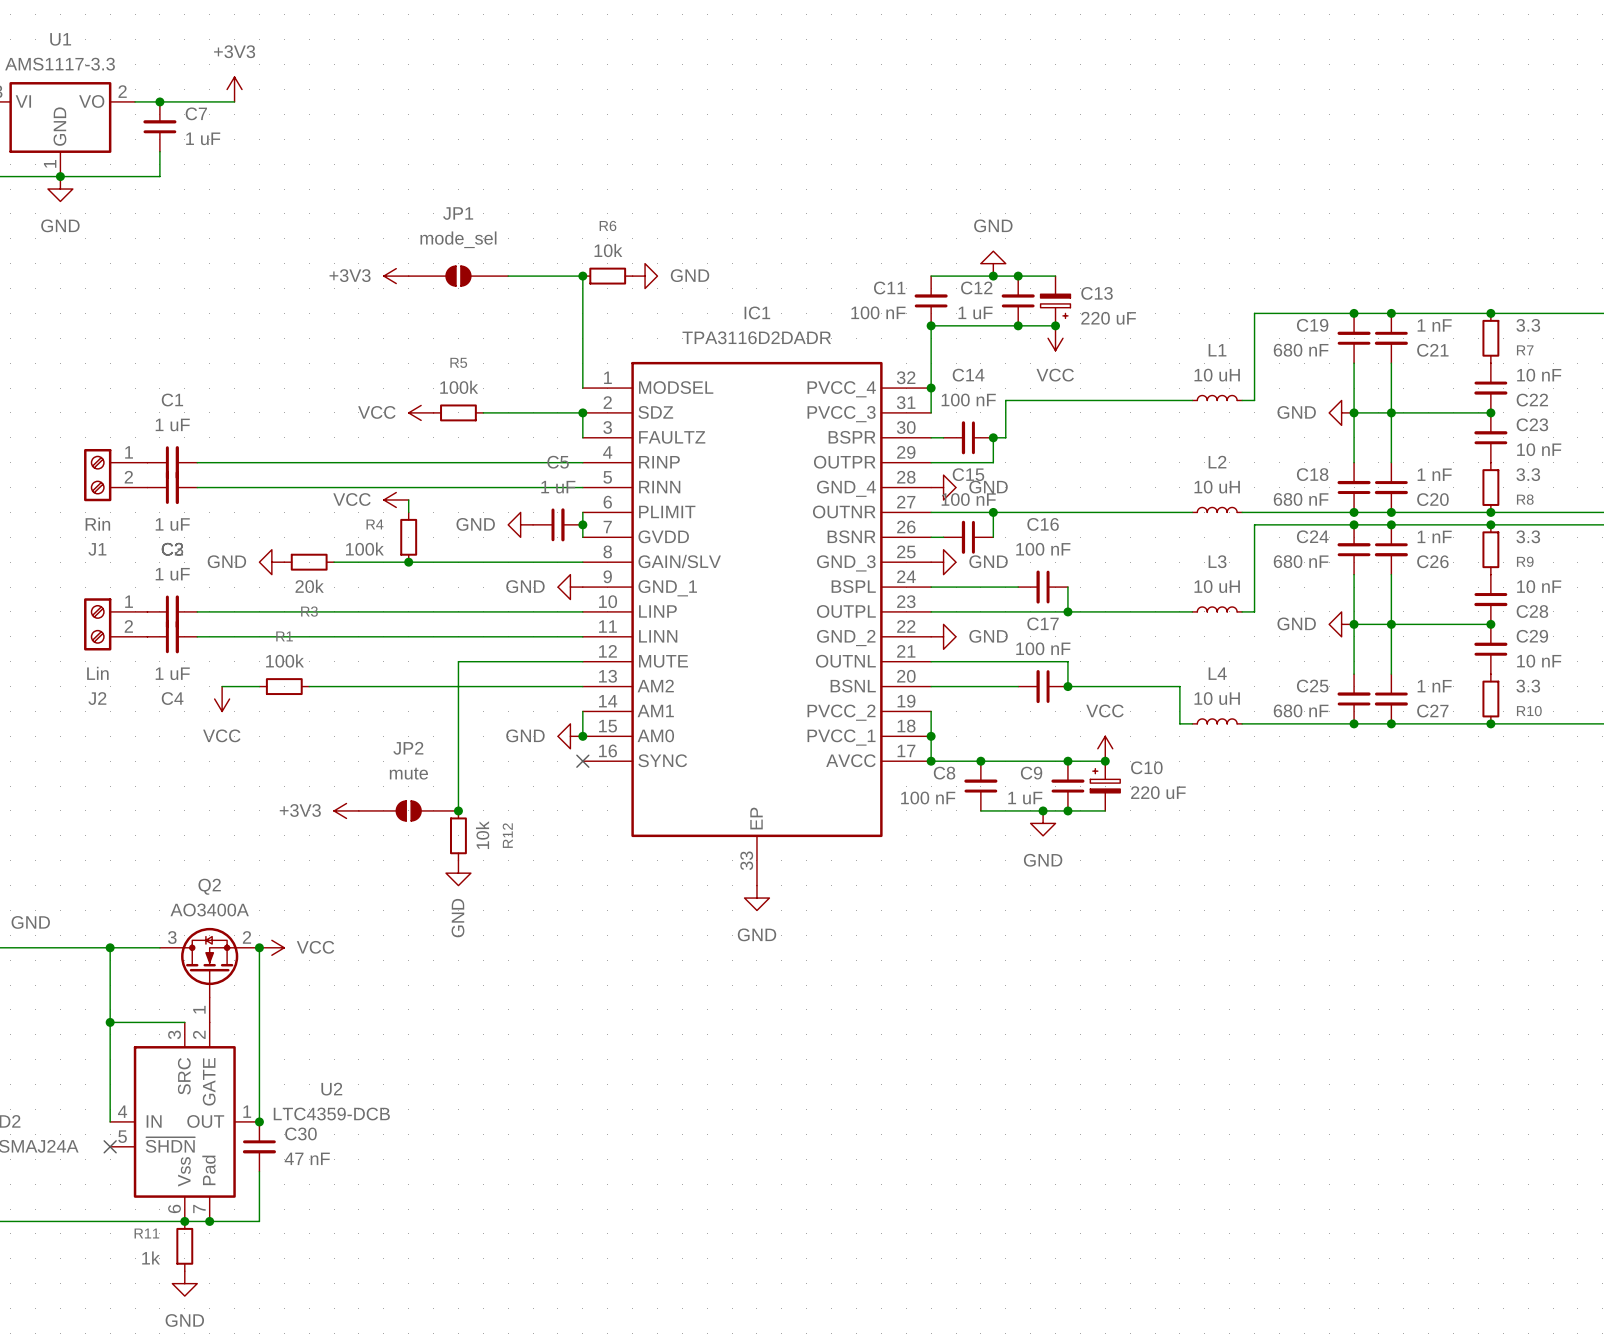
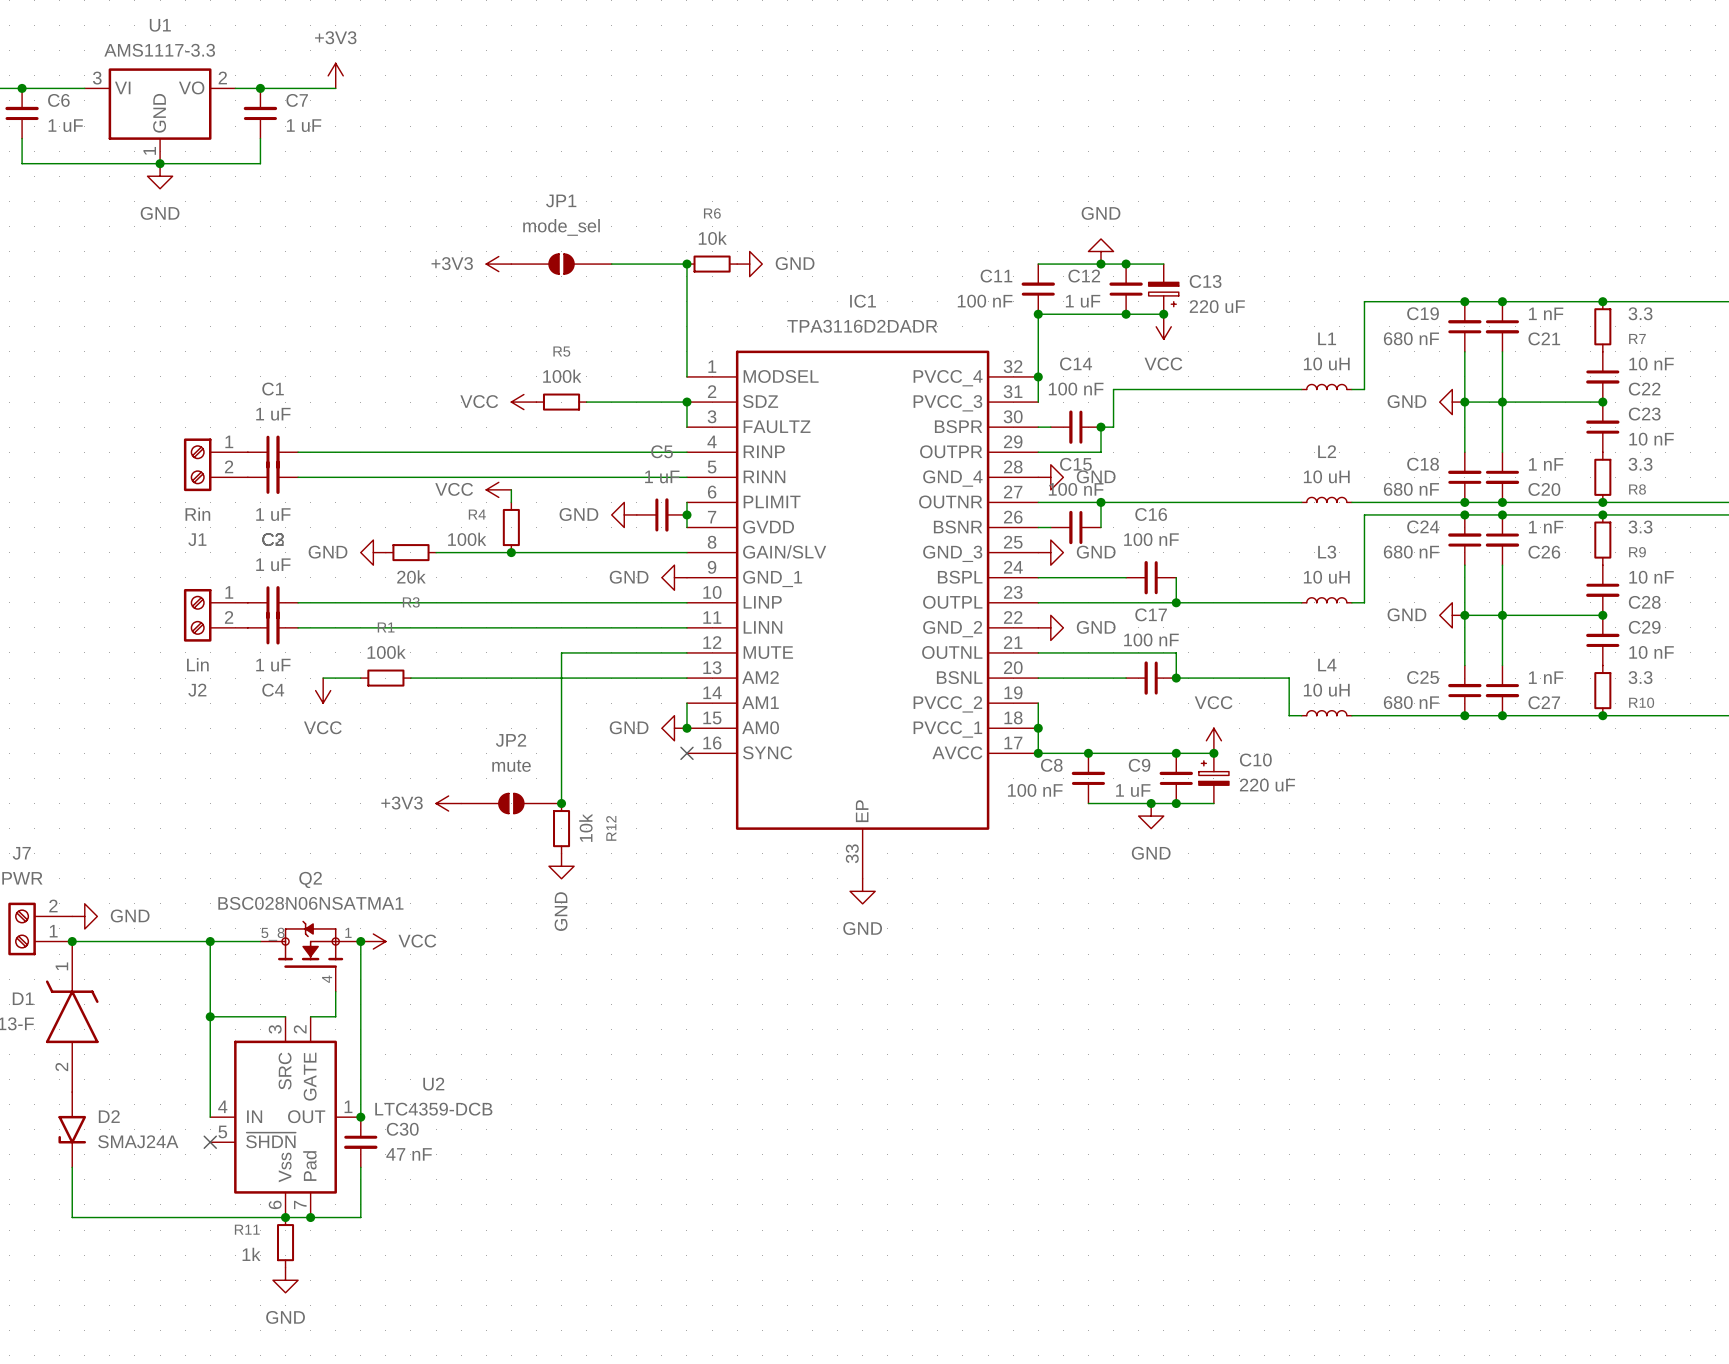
Q2 value: AO3400A (209, 910) -> BSC028N06NSATMA1 (310, 903)
Q2 symbol: [159, 927, 260, 1023] -> [260, 920, 361, 992]
wire: none -> (335, 991) (335, 1016) (310, 1016)

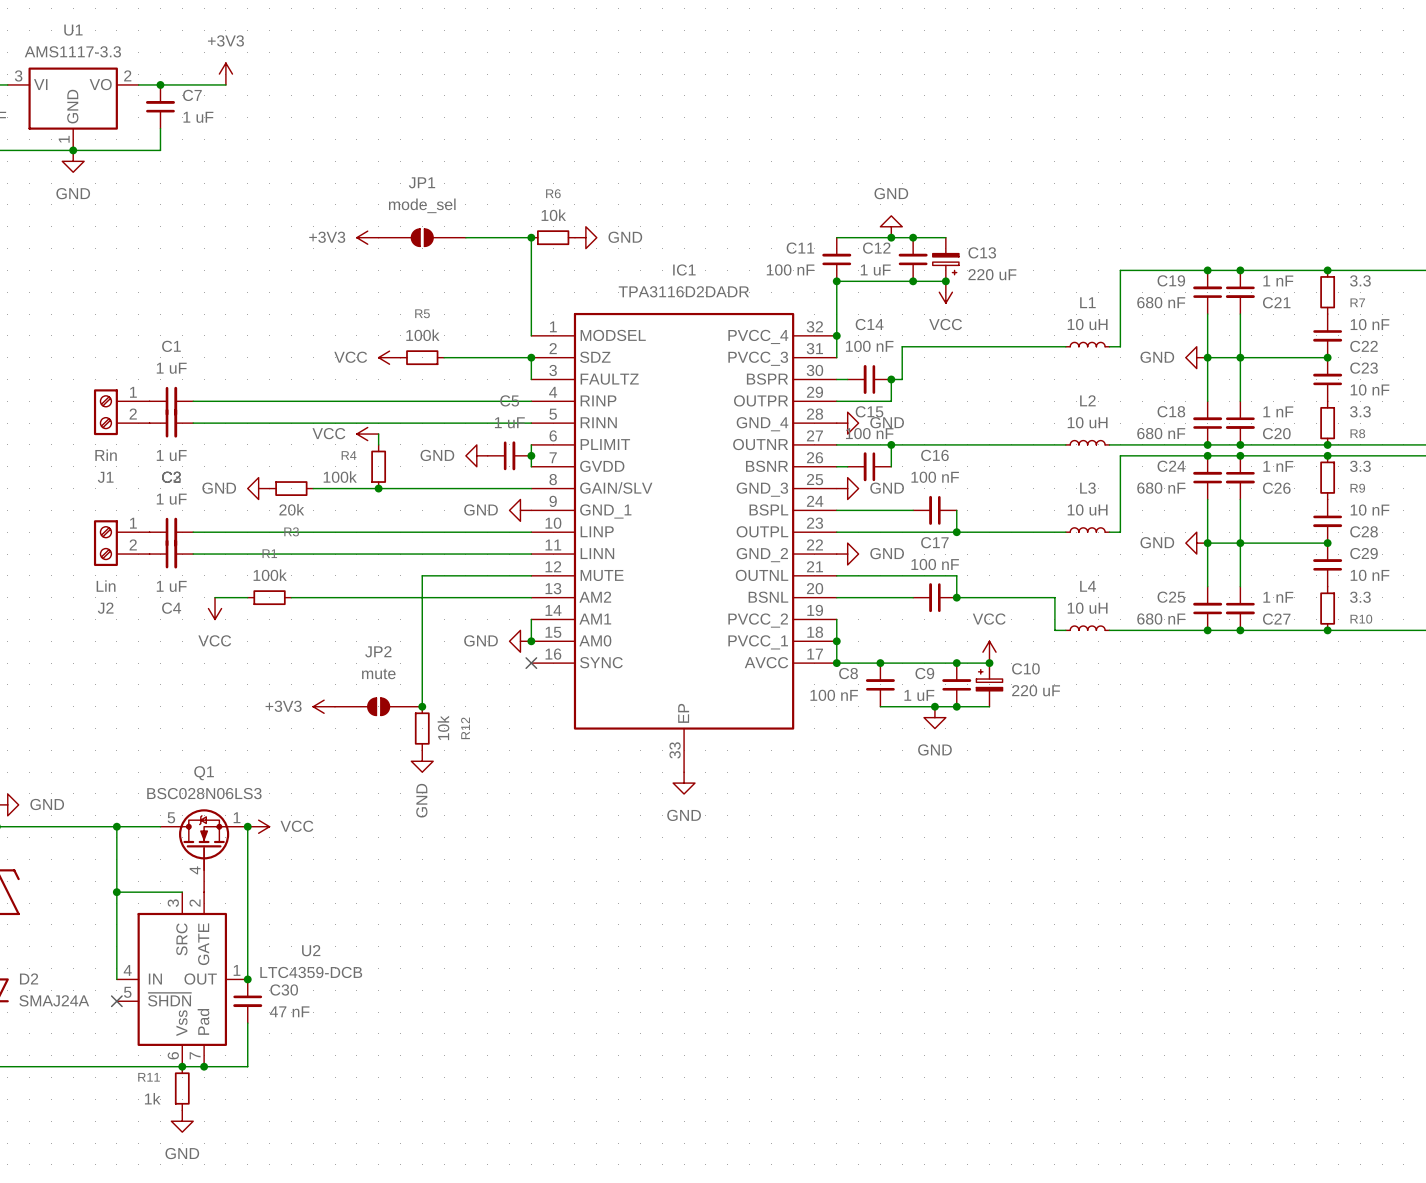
Q2: BSC028N06NSATMA1 (310, 956) -> none
Q1: none -> BSC028N06LS3 (204, 850)
wire: (335, 991) (335, 1016) (310, 1016) -> none

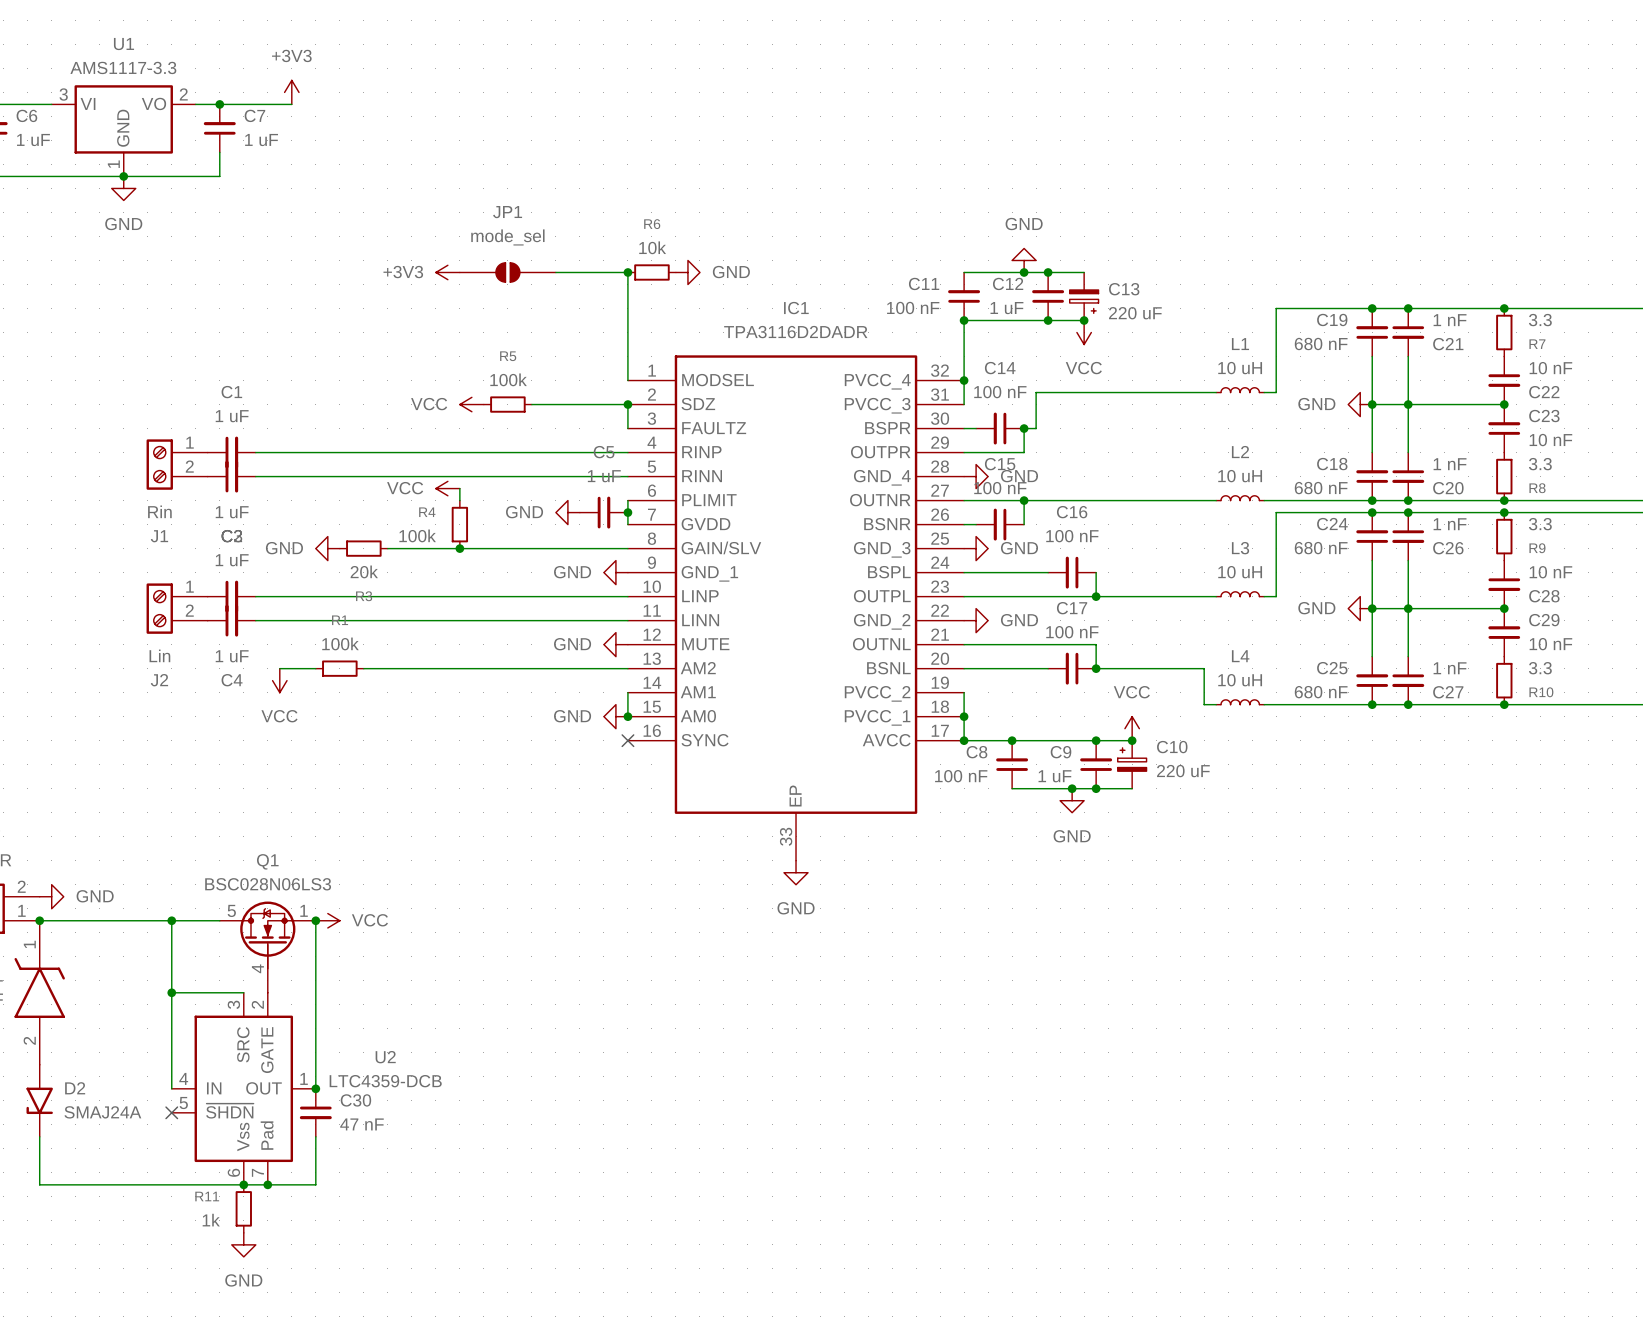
wire: (531, 575) (422, 575) (422, 706) -> none
power symbol: +3V3 (324, 706) -> none
JP2: mute (378, 706) -> none
junction: (422, 706) -> none
R12: 10k (422, 728) -> none
power symbol rotation: 0° (422, 761) -> 90° clockwise (615, 644)
power symbol position: GND (422, 761) -> GND (615, 644)

